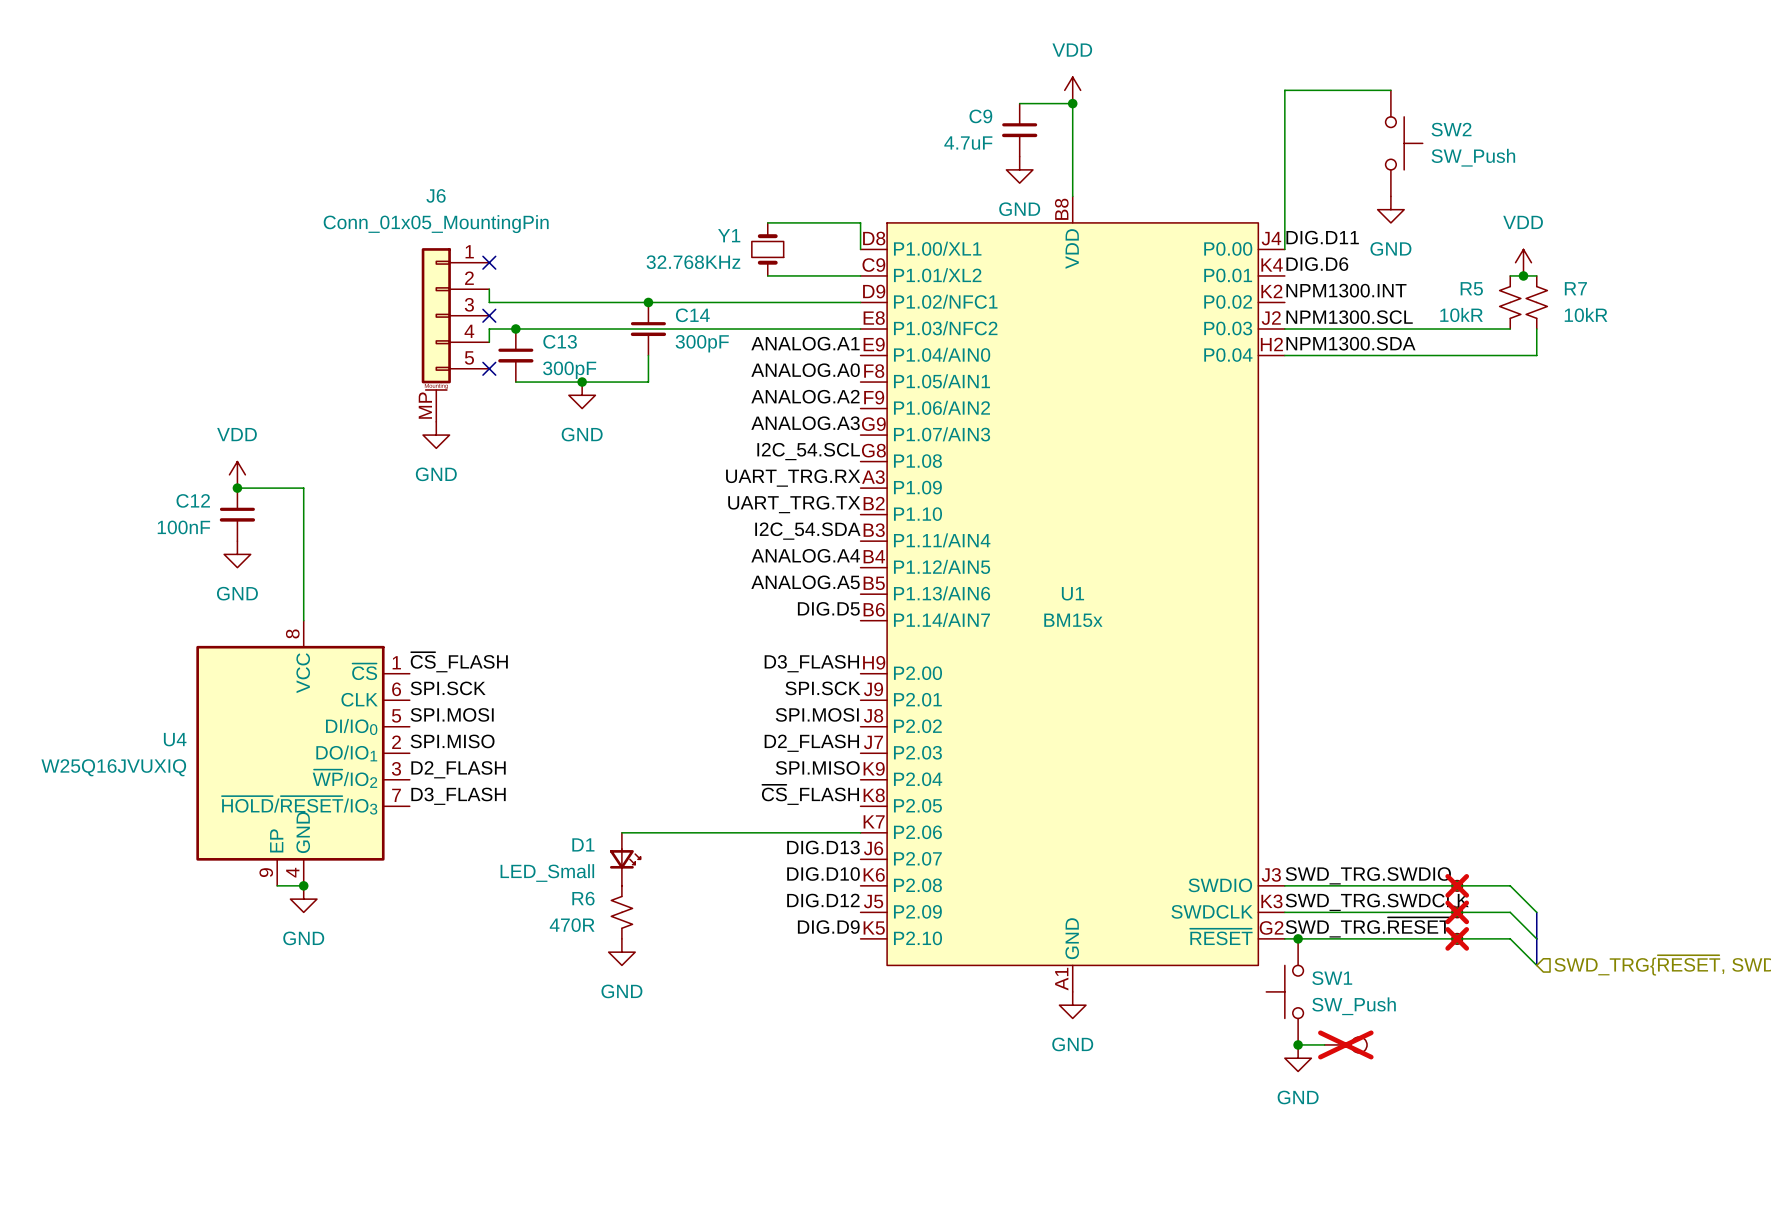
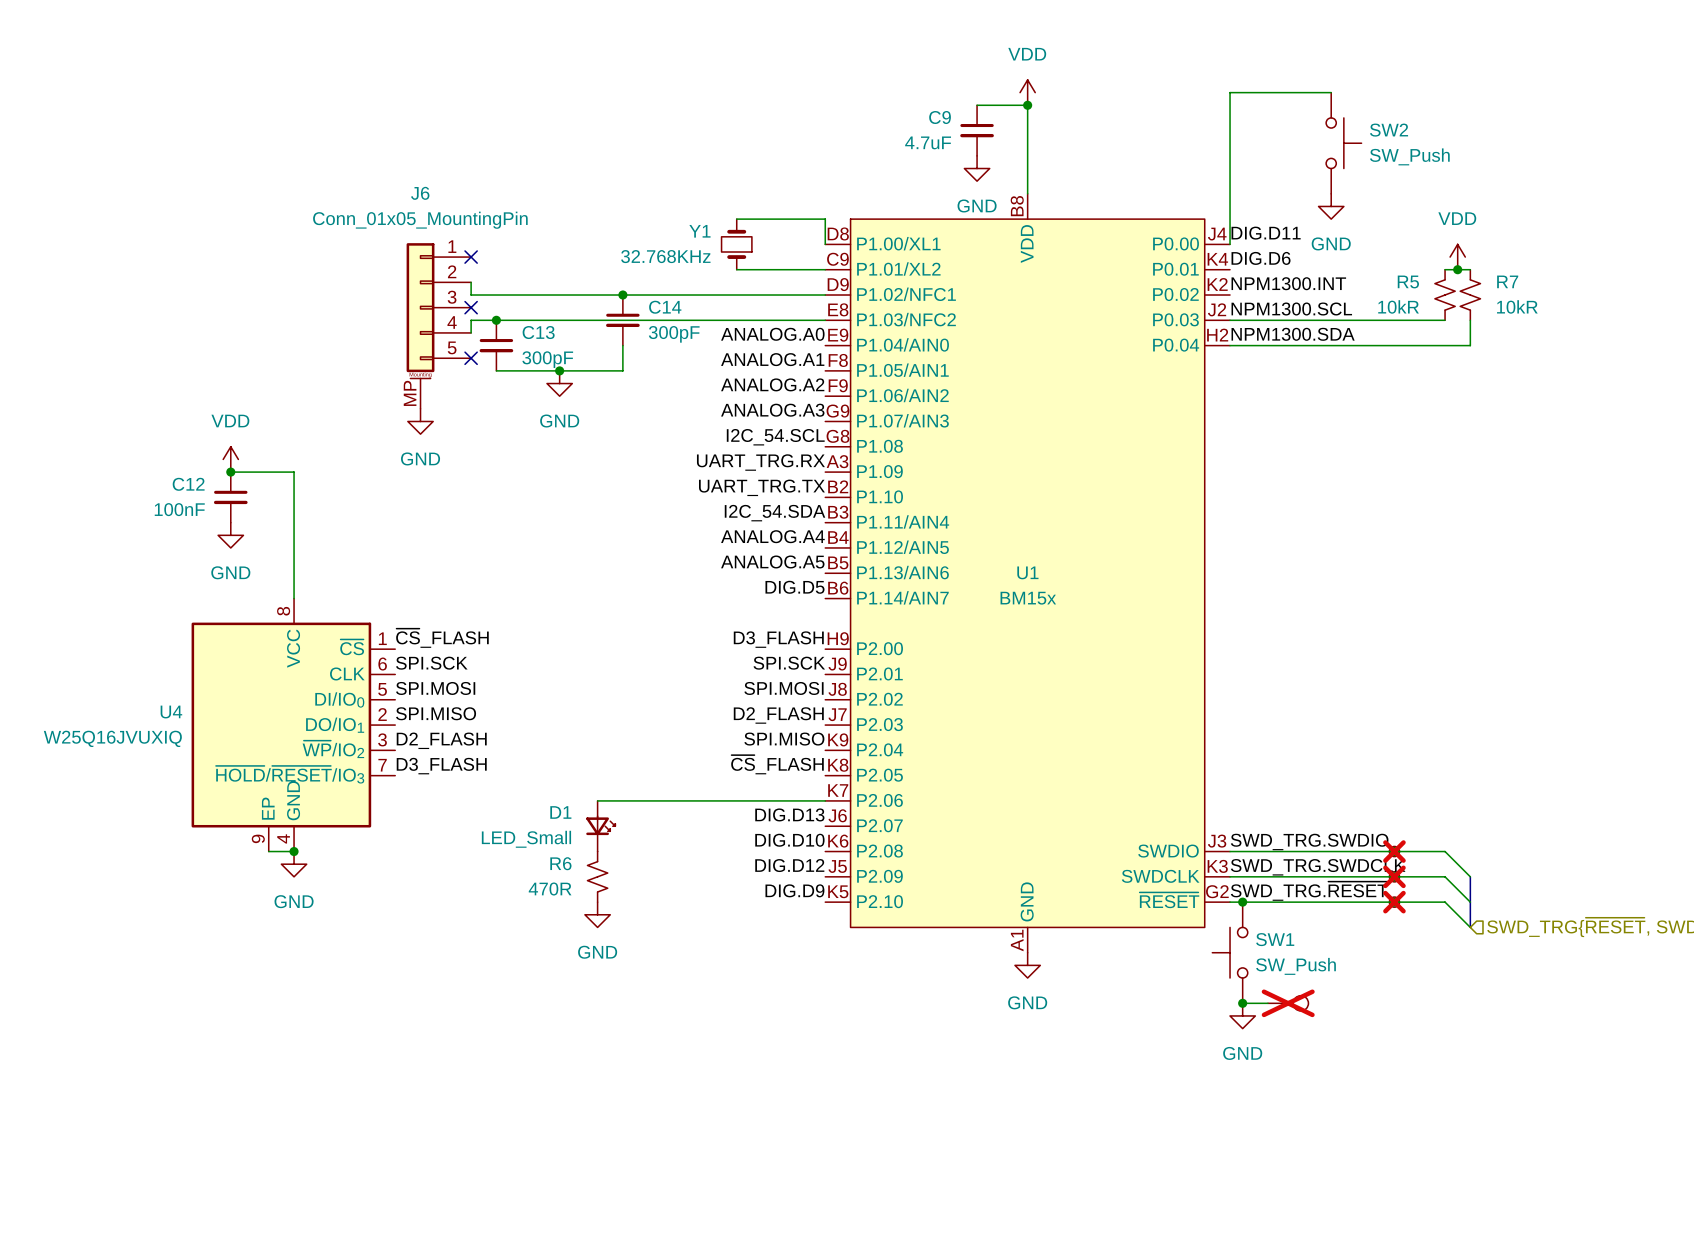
label: ANALOG.A1 (805, 343) -> ANALOG.A0 (772, 334)
label: ANALOG.A0 (805, 370) -> ANALOG.A1 (772, 359)

